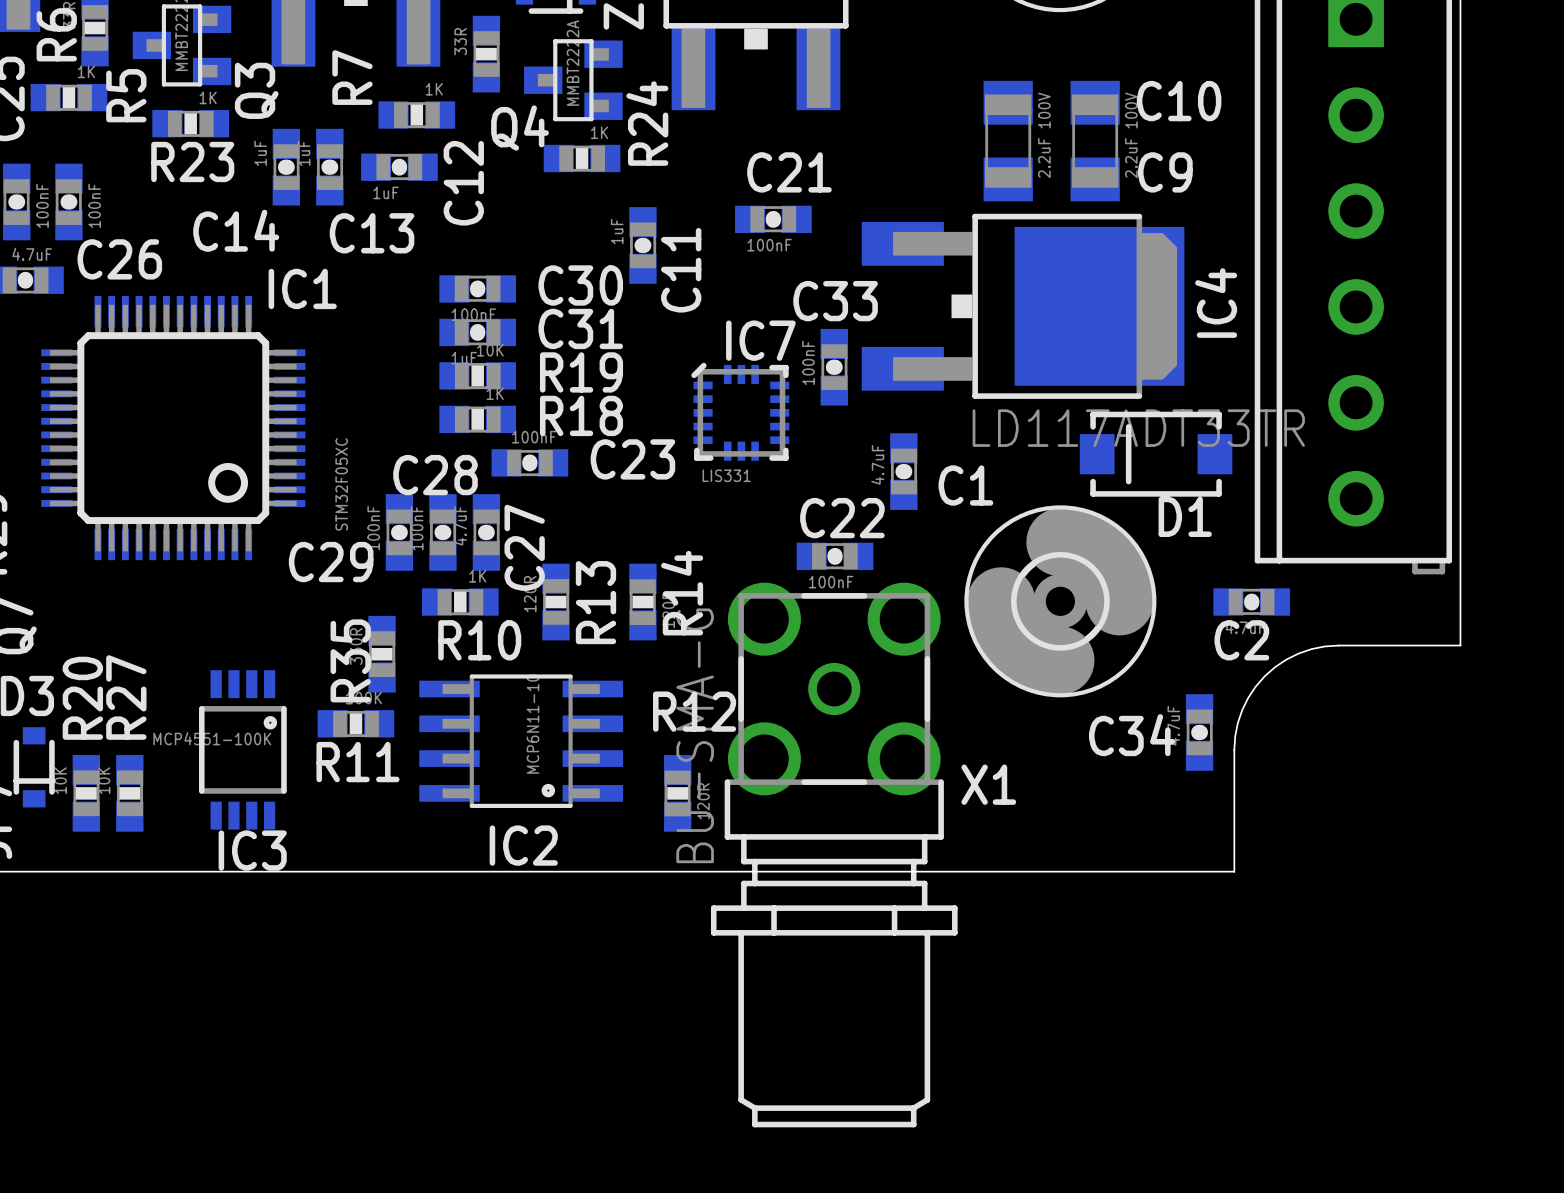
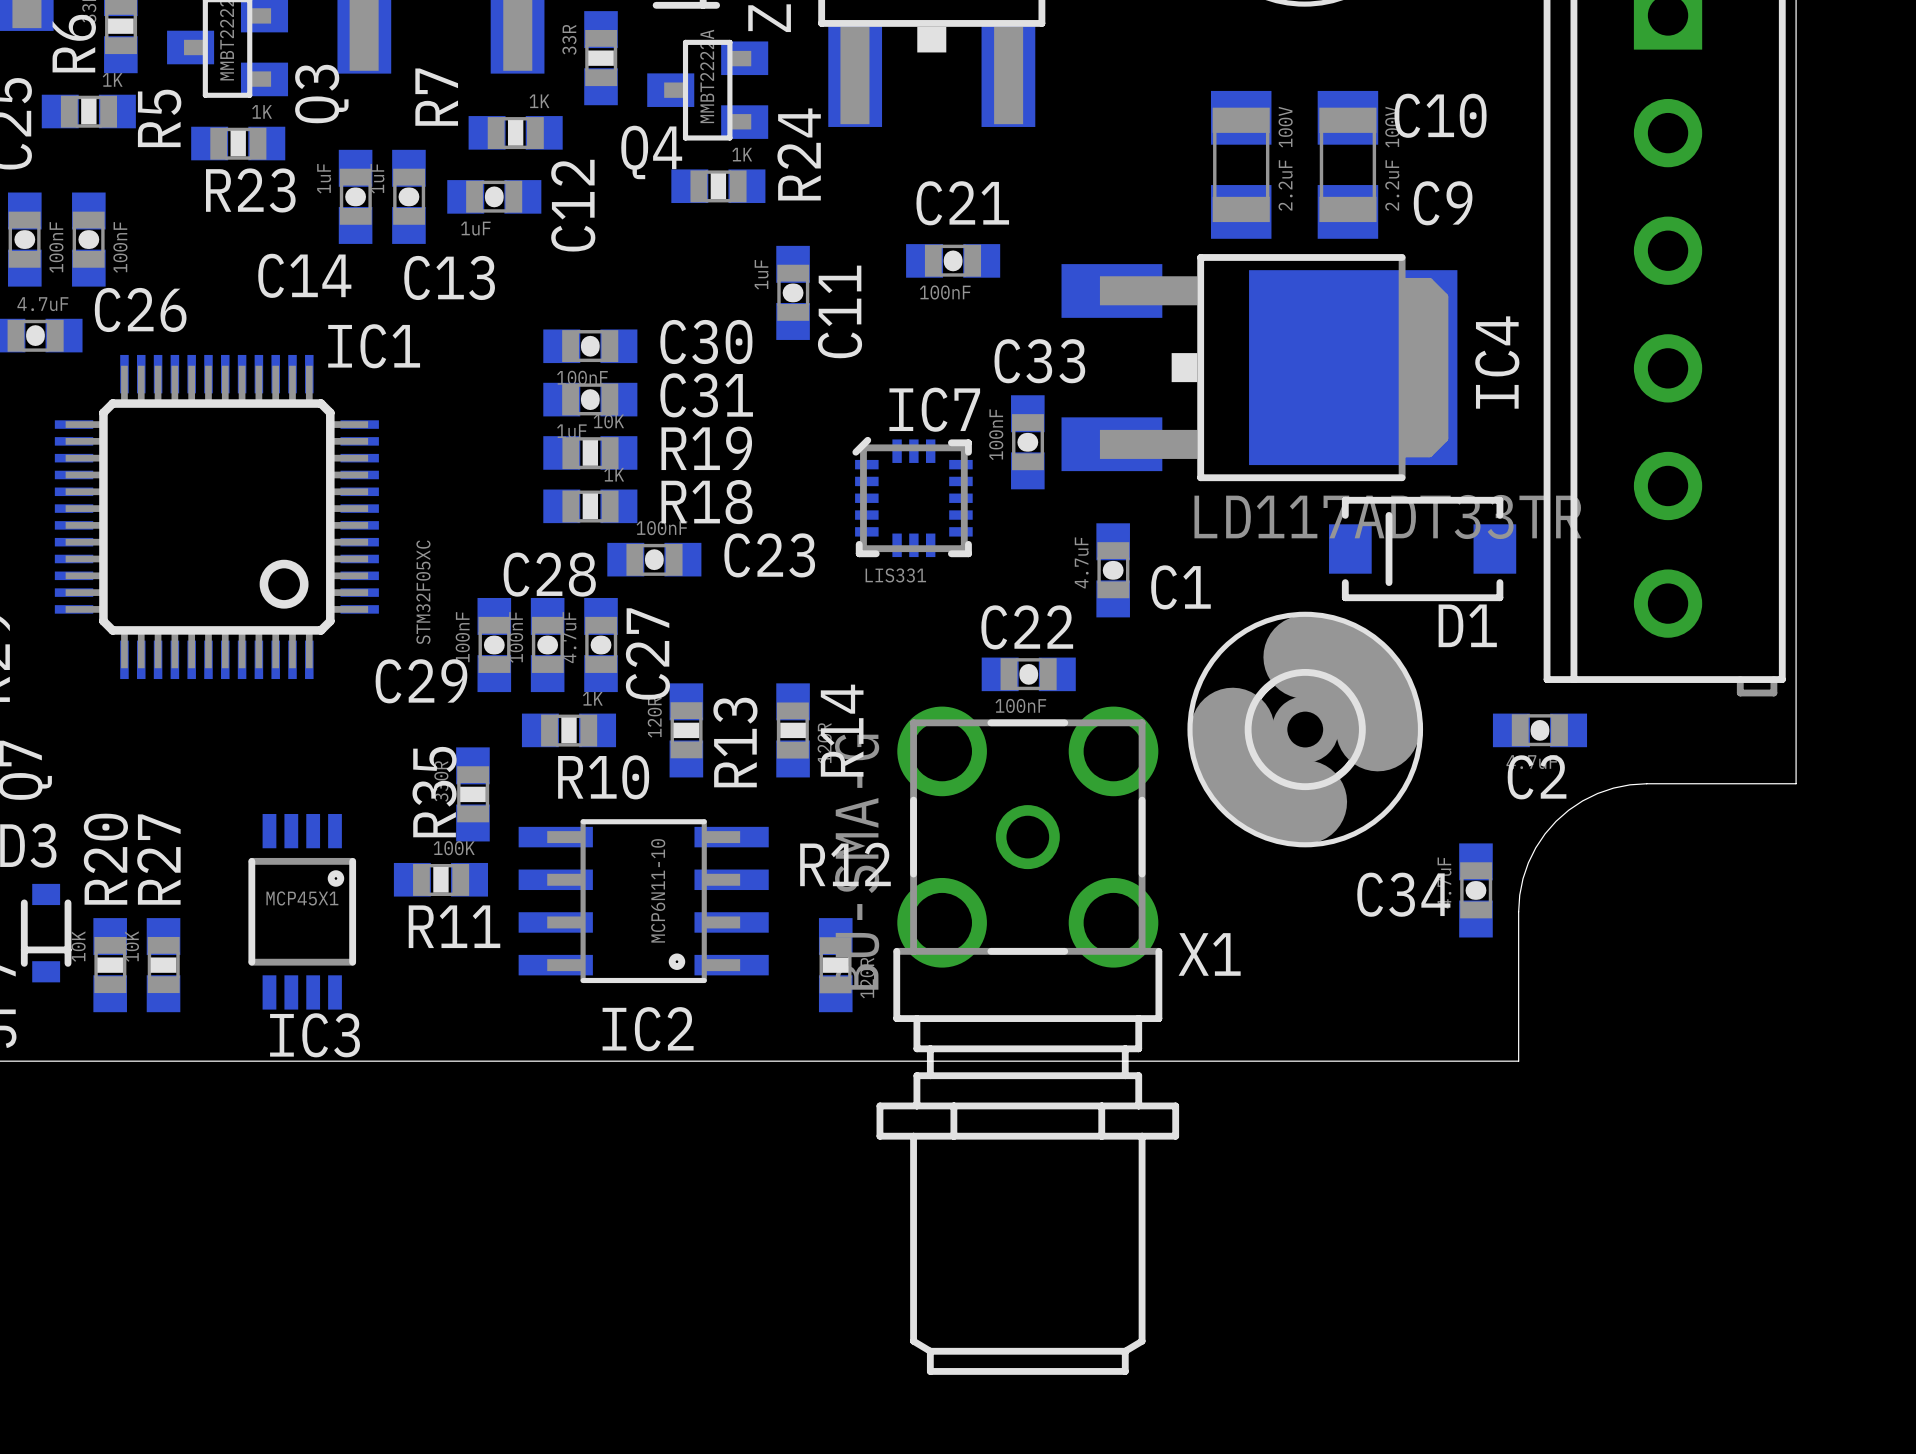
IC3 value: MCP4551-100K (212, 738) -> MCP45X1 (302, 898)

